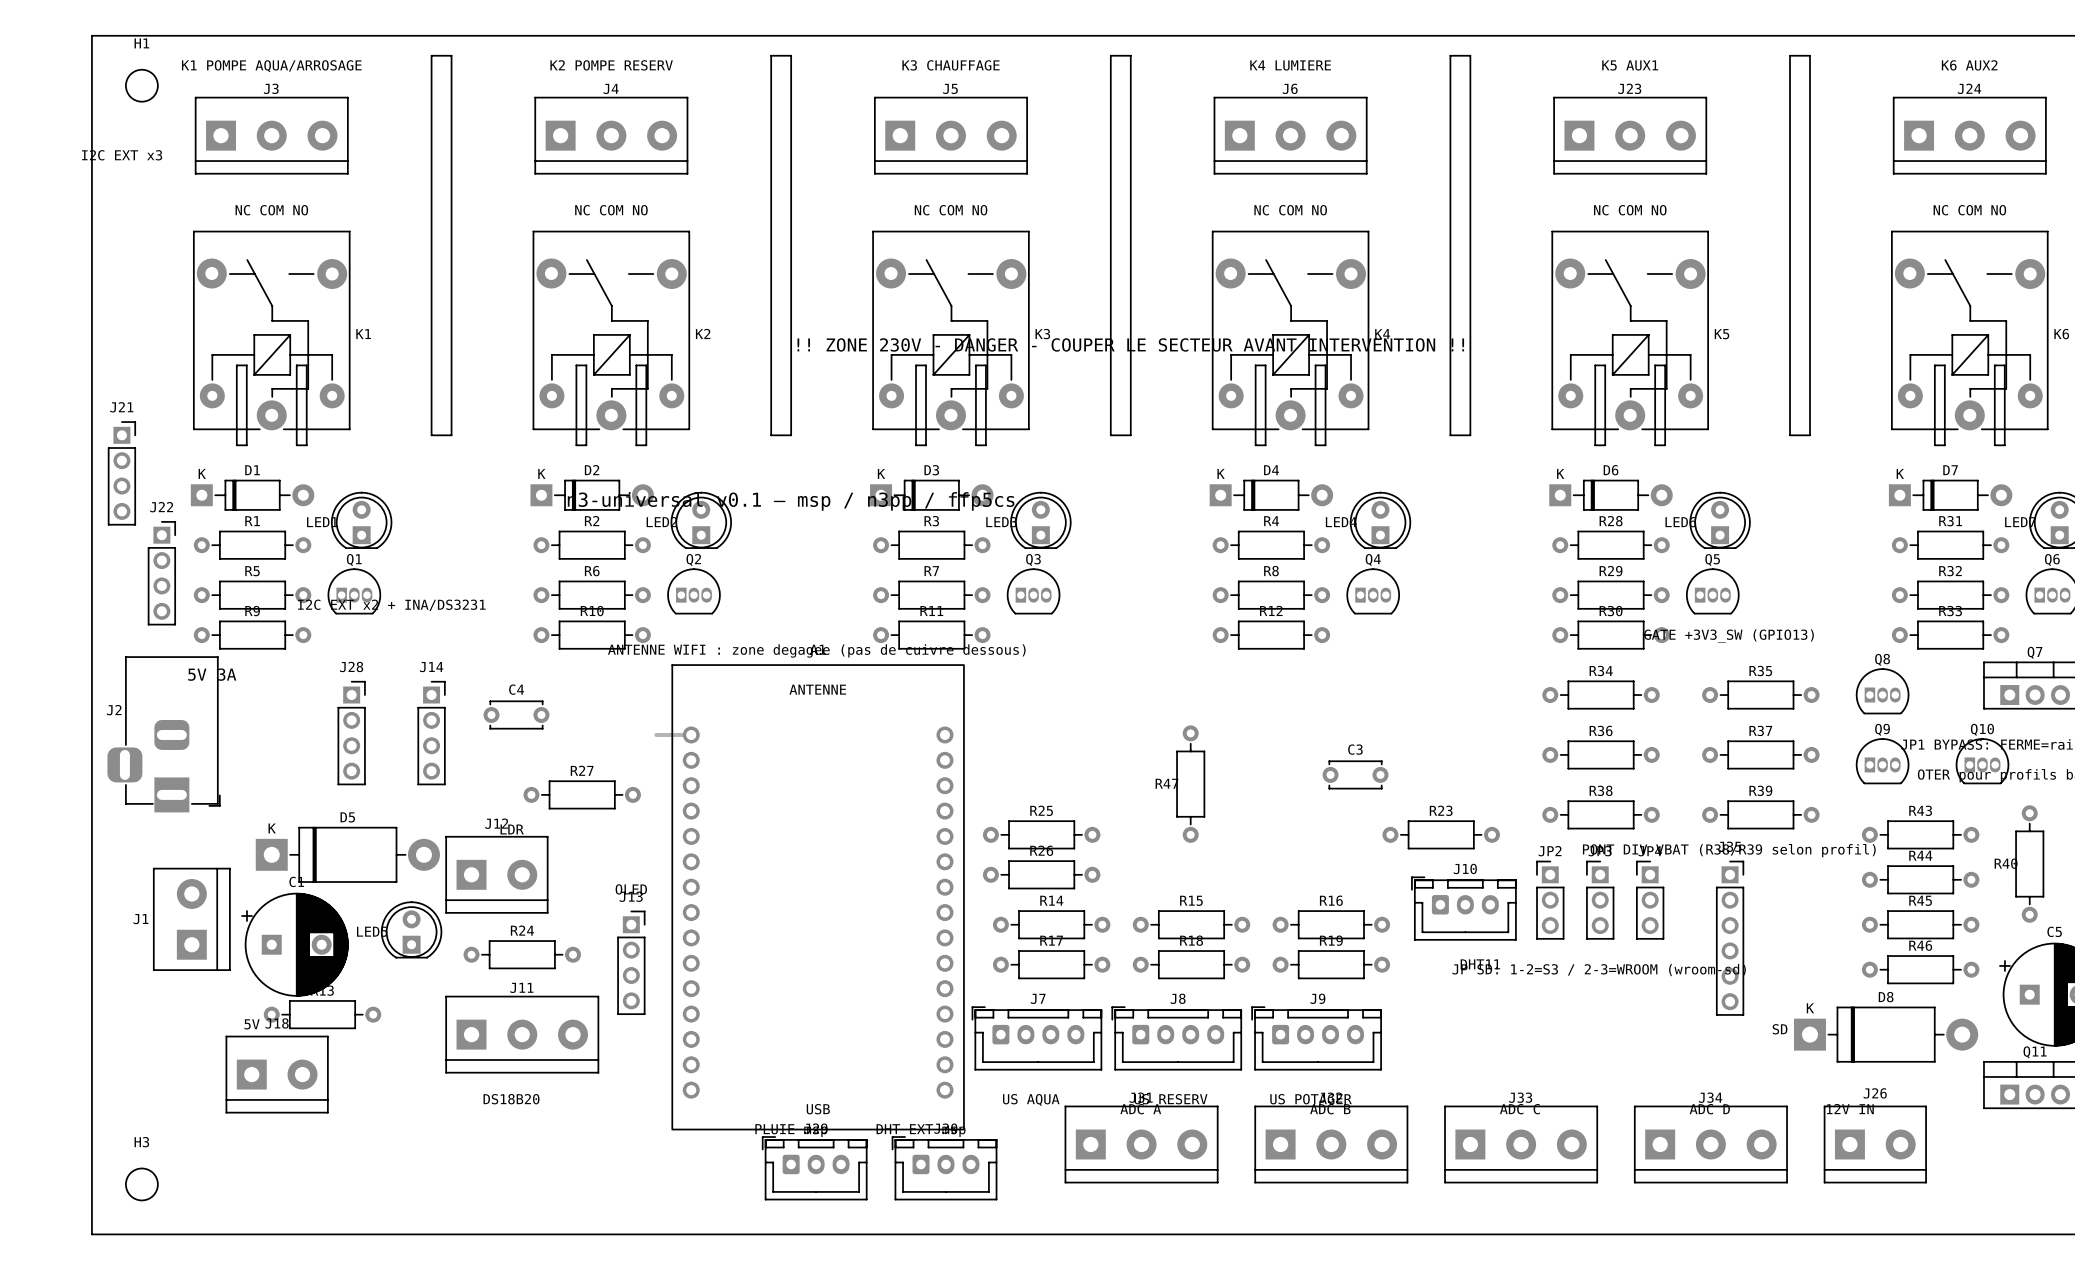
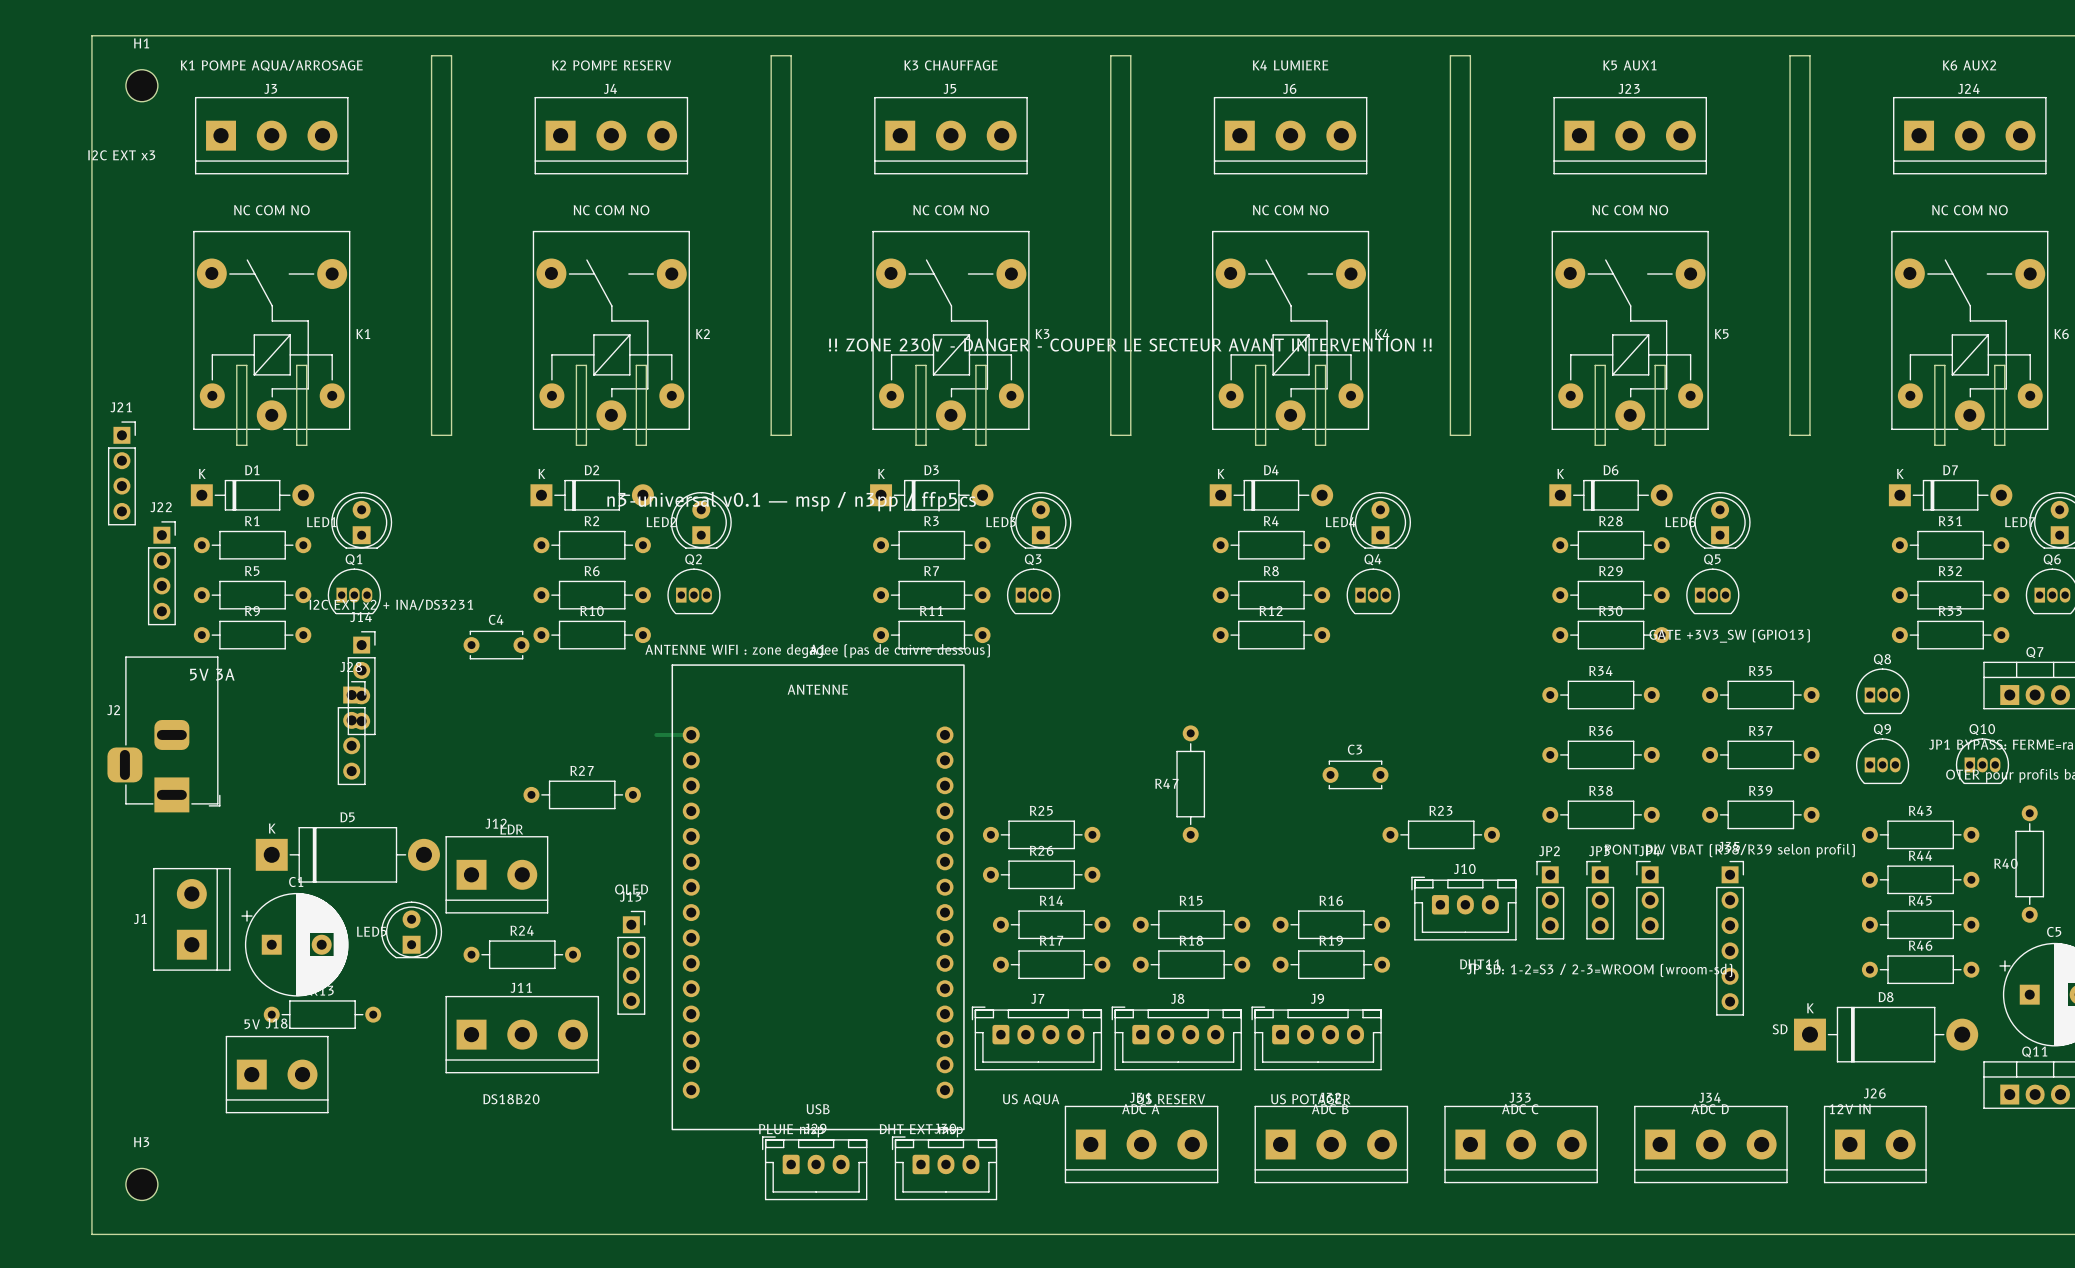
C4 position: (516, 715) -> (496, 645)
J14 position: (431, 733) -> (361, 683)

